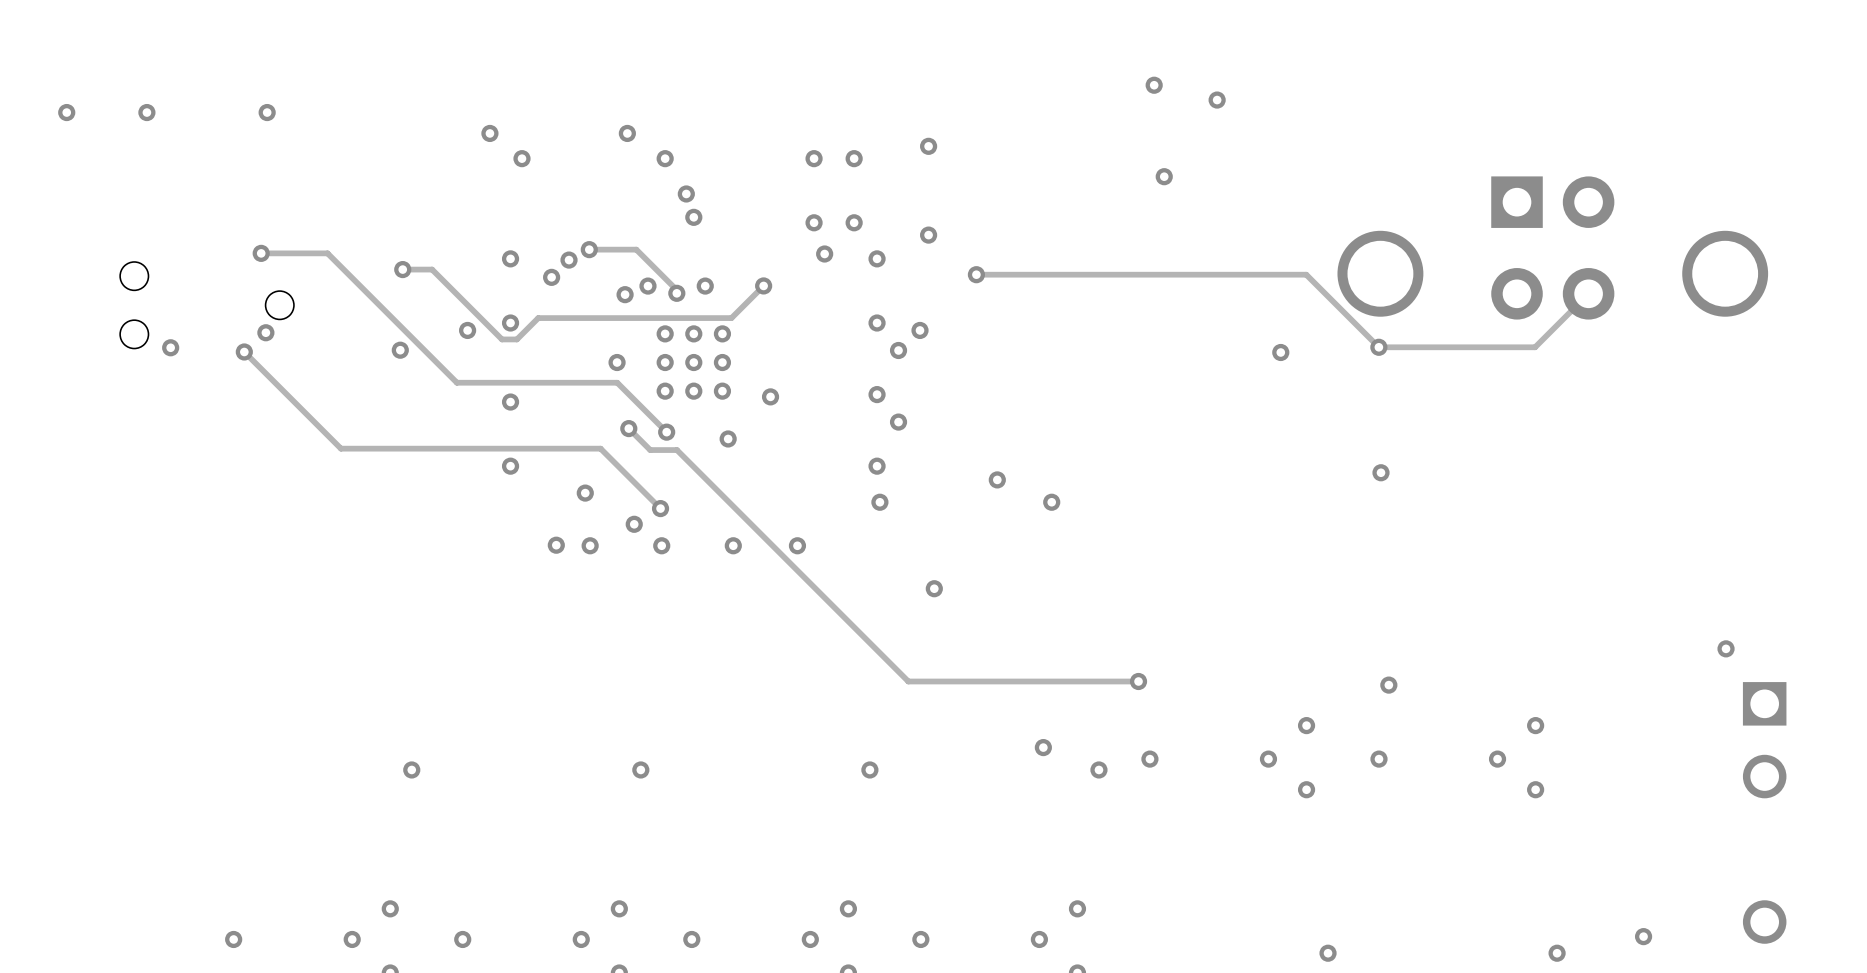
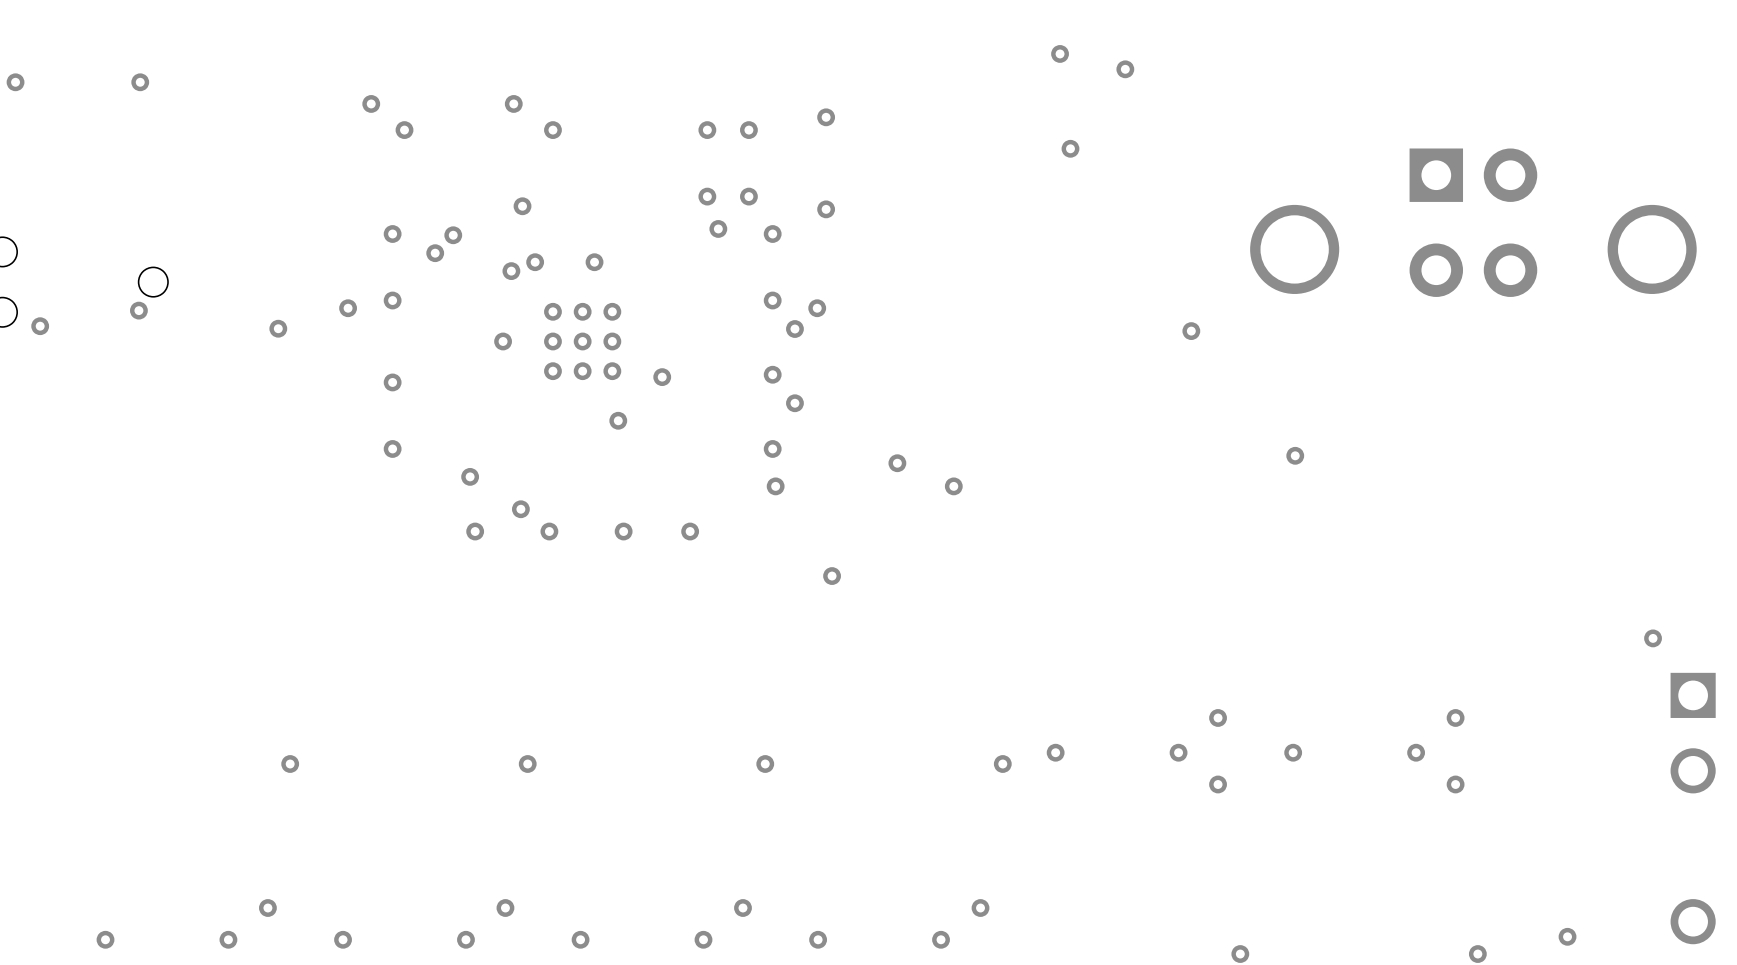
via: (686, 193) -> none
via: (693, 217) -> none
via: none -> (522, 206)
track: (589, 249) (636, 249) (676, 290) (676, 293) -> none
via: (589, 249) -> none
track: (261, 253) (327, 253) (456, 382) (617, 382) (666, 432) -> none
via: (261, 253) -> none
track: (402, 269) (432, 269) (501, 339) (516, 339) (538, 318) (731, 318) (763, 285) -> none
via: (402, 269) -> none
track: (976, 274) (1306, 274) (1378, 347) (1535, 347) (1588, 293) -> none
via: (976, 274) -> none
via: (763, 285) -> none
via: (676, 293) -> none
via: (1378, 347) -> none
track: (244, 351) (340, 448) (600, 448) (660, 508) -> none
via: (244, 351) -> none
track: (628, 428) (650, 450) (676, 450) (908, 681) (1138, 681) -> none
via: (628, 428) -> none
via: (666, 432) -> none
via: (660, 508) -> none
via: (556, 545) -> none
via: (1138, 681) -> none
via: (1388, 685) -> none
via: (1043, 747) -> none

